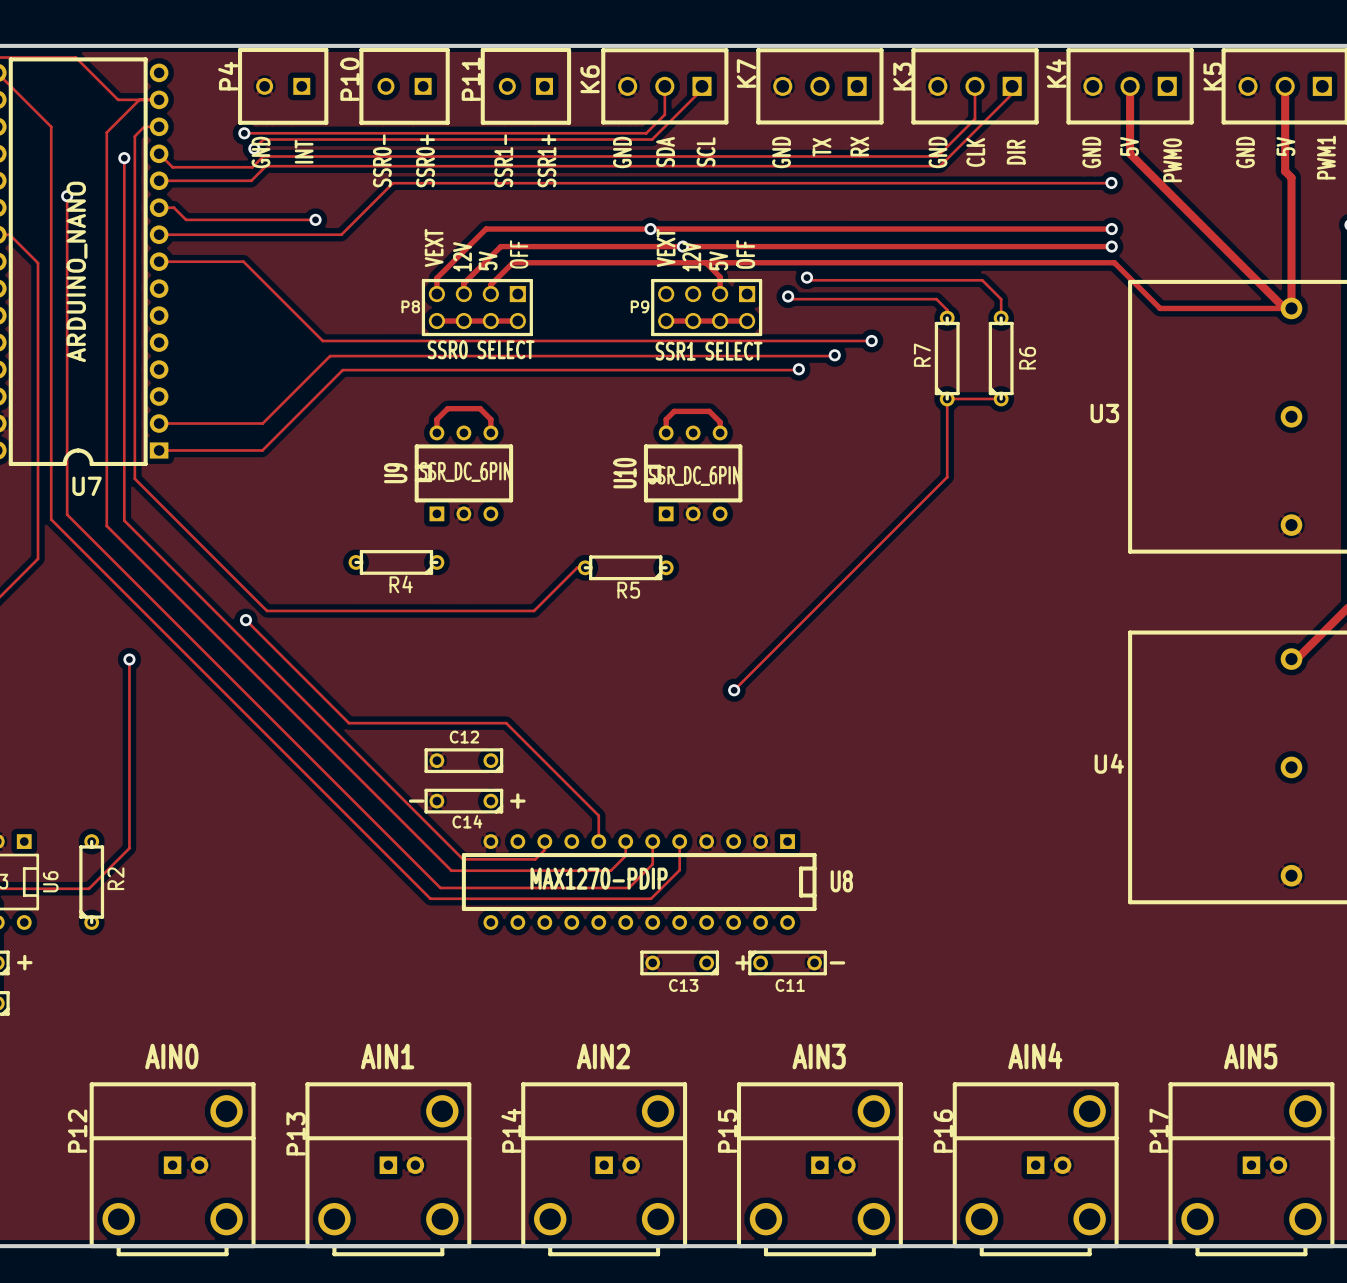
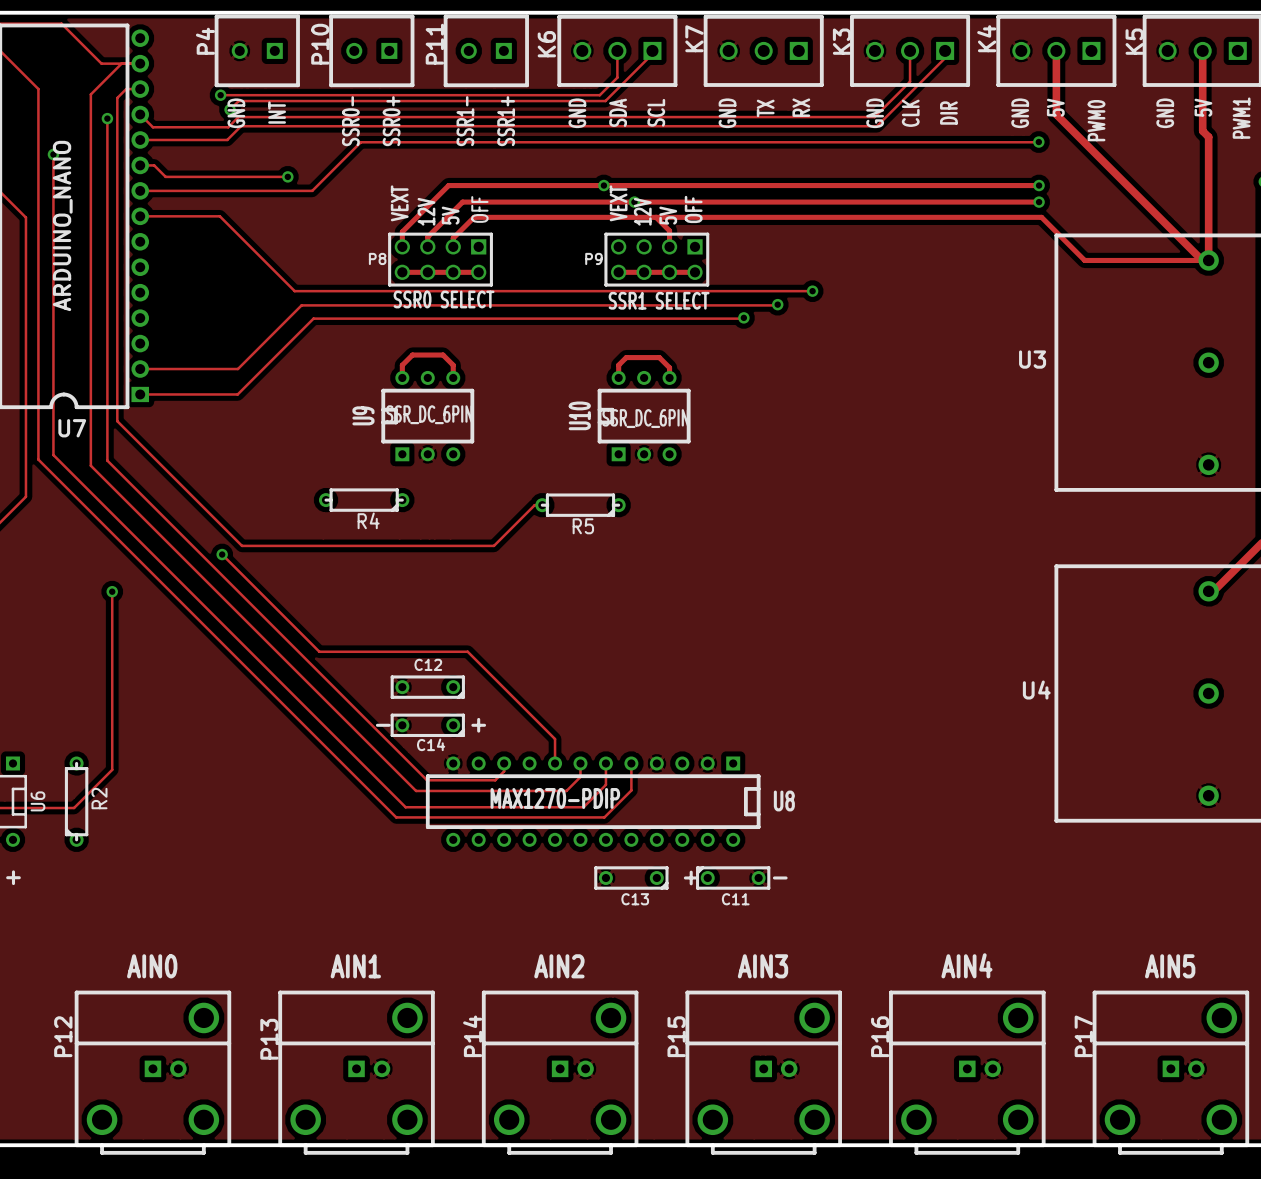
track: (806, 277) (809, 280) (982, 280) (1001, 299) (1001, 318) -> none
via: (806, 277) -> none
track: (788, 296) (790, 299) (936, 299) (947, 309) (947, 318) -> none
via: (788, 296) -> none
R7: (947, 358) -> none
R6: (1001, 358) -> none
track: (1001, 398) (947, 398) (947, 477) (734, 690) -> none
via: (734, 690) -> none

